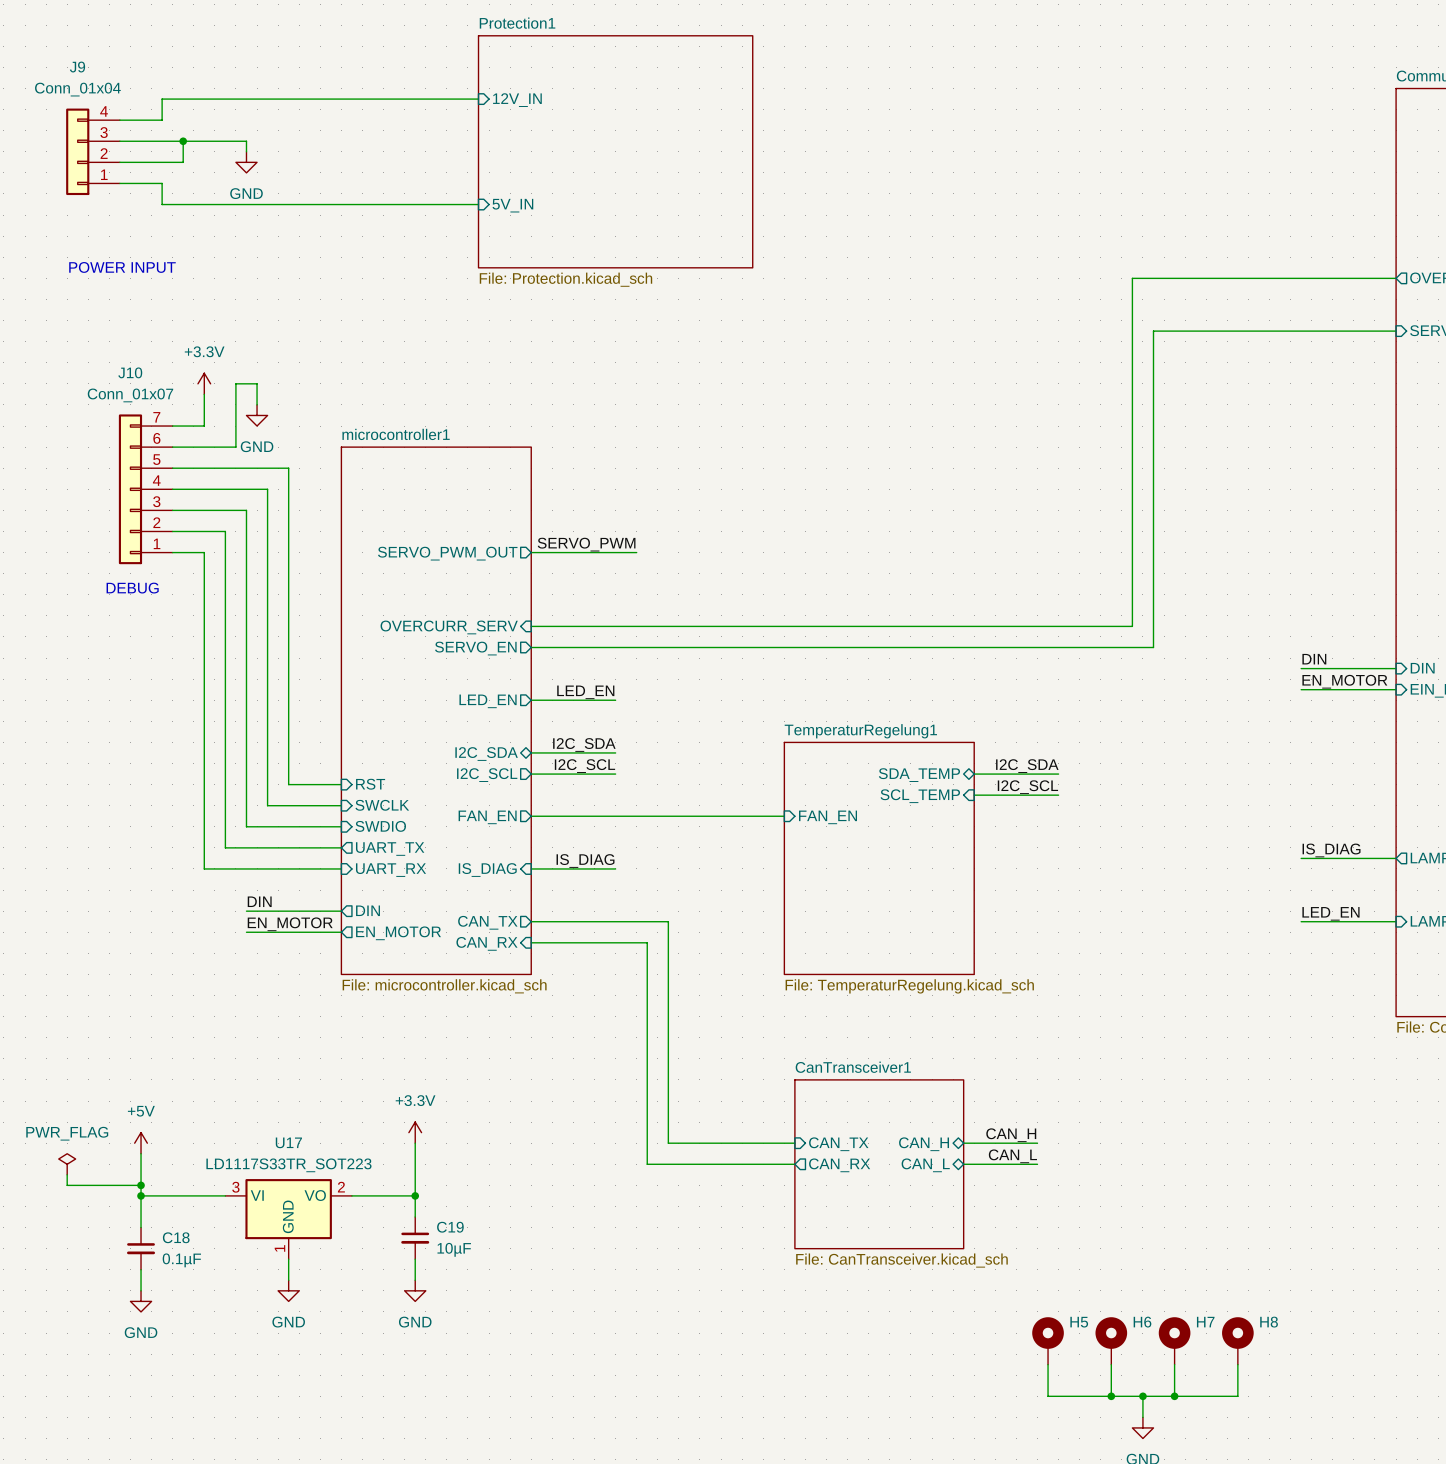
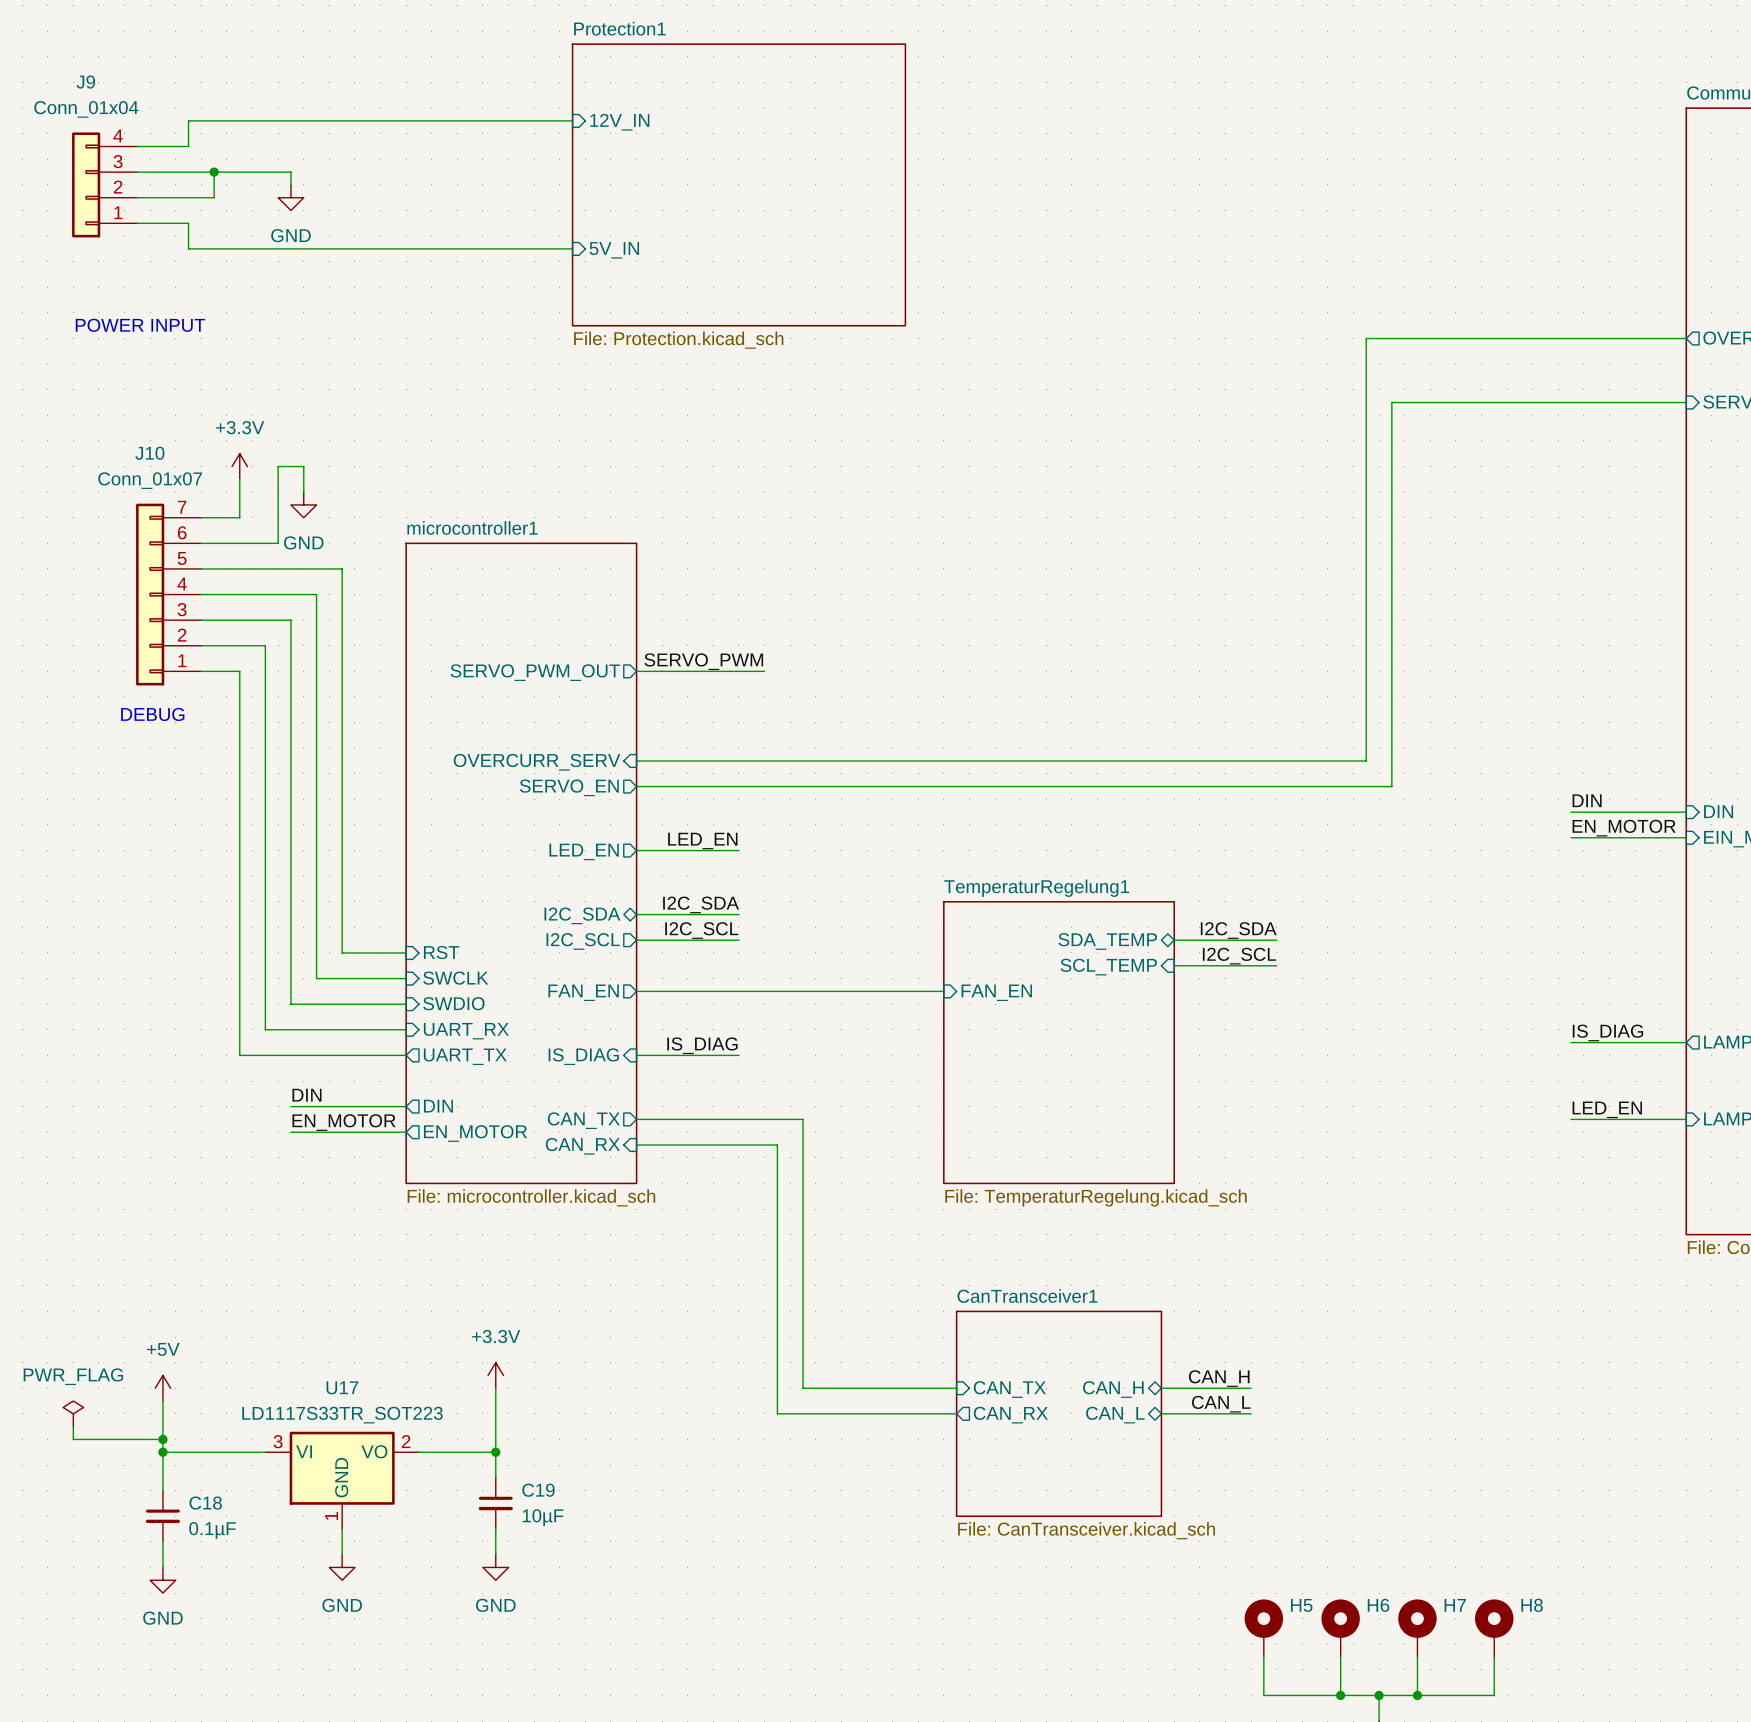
sheet pin shape: output (390, 849) -> input (466, 1031)
sheet pin: UART_TX (390, 849) -> UART_RX (466, 1031)
sheet pin shape: input (391, 870) -> output (465, 1056)
sheet pin: UART_RX (391, 870) -> UART_TX (465, 1056)

